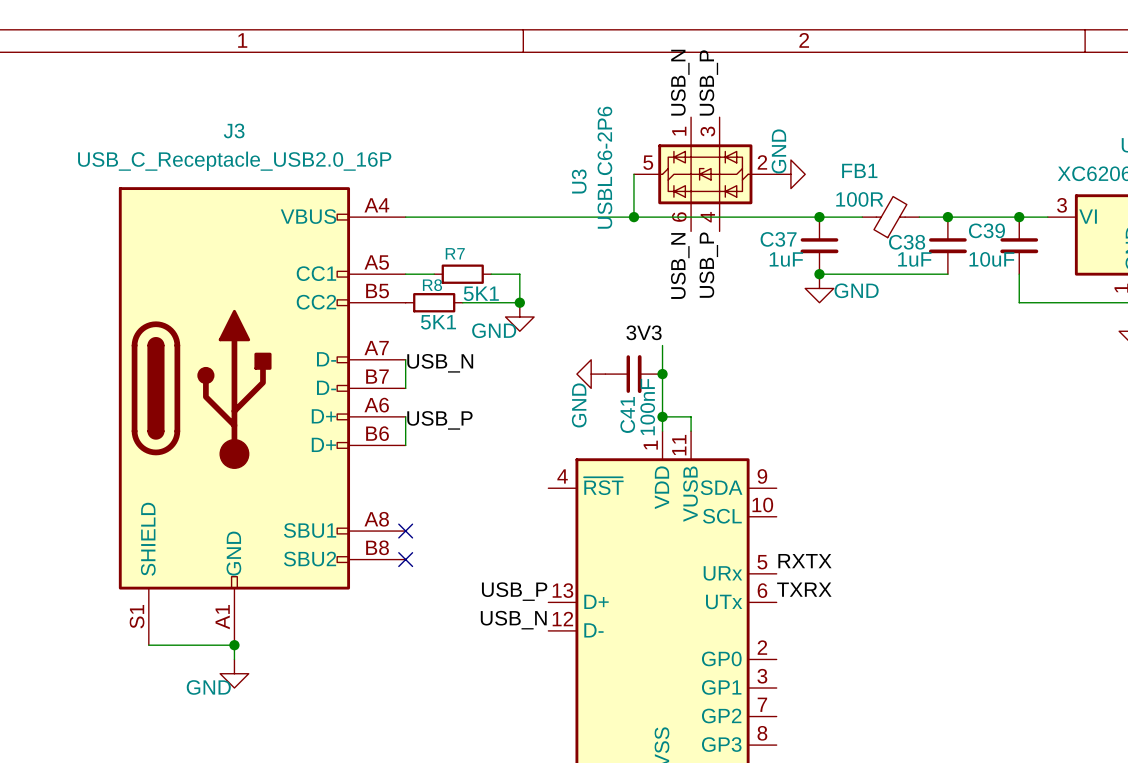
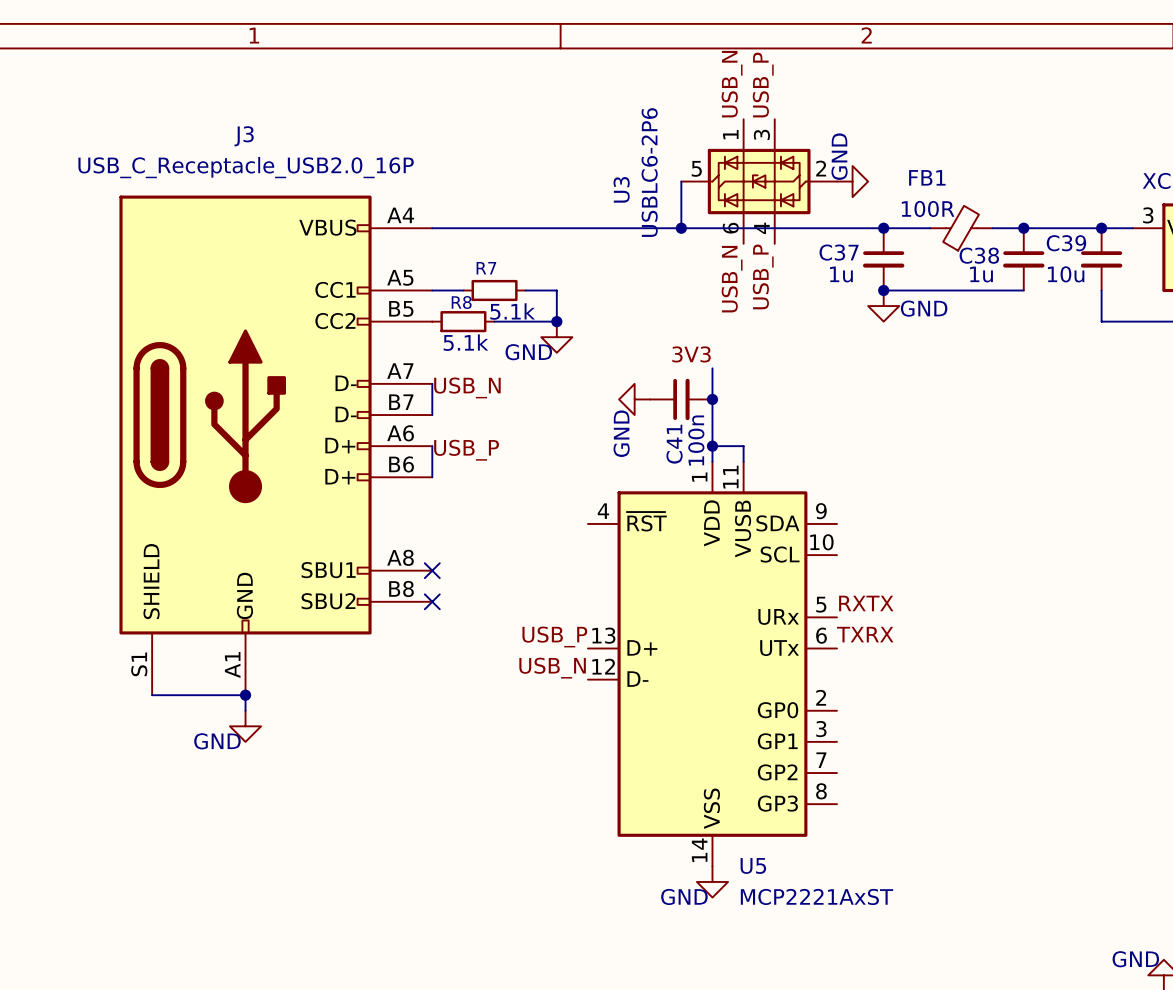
C37 value: 1uF (786, 259) -> 1u (841, 274)
C38 value: 1uF (914, 259) -> 1u (981, 274)
C39 value: 10uF (991, 259) -> 10u (1066, 274)
R7 value: 5K1 (481, 293) -> 5.1k (512, 311)
R8 value: 5K1 (438, 322) -> 5.1k (465, 342)
C41 value: 100nF (647, 407) -> 100n (696, 440)

